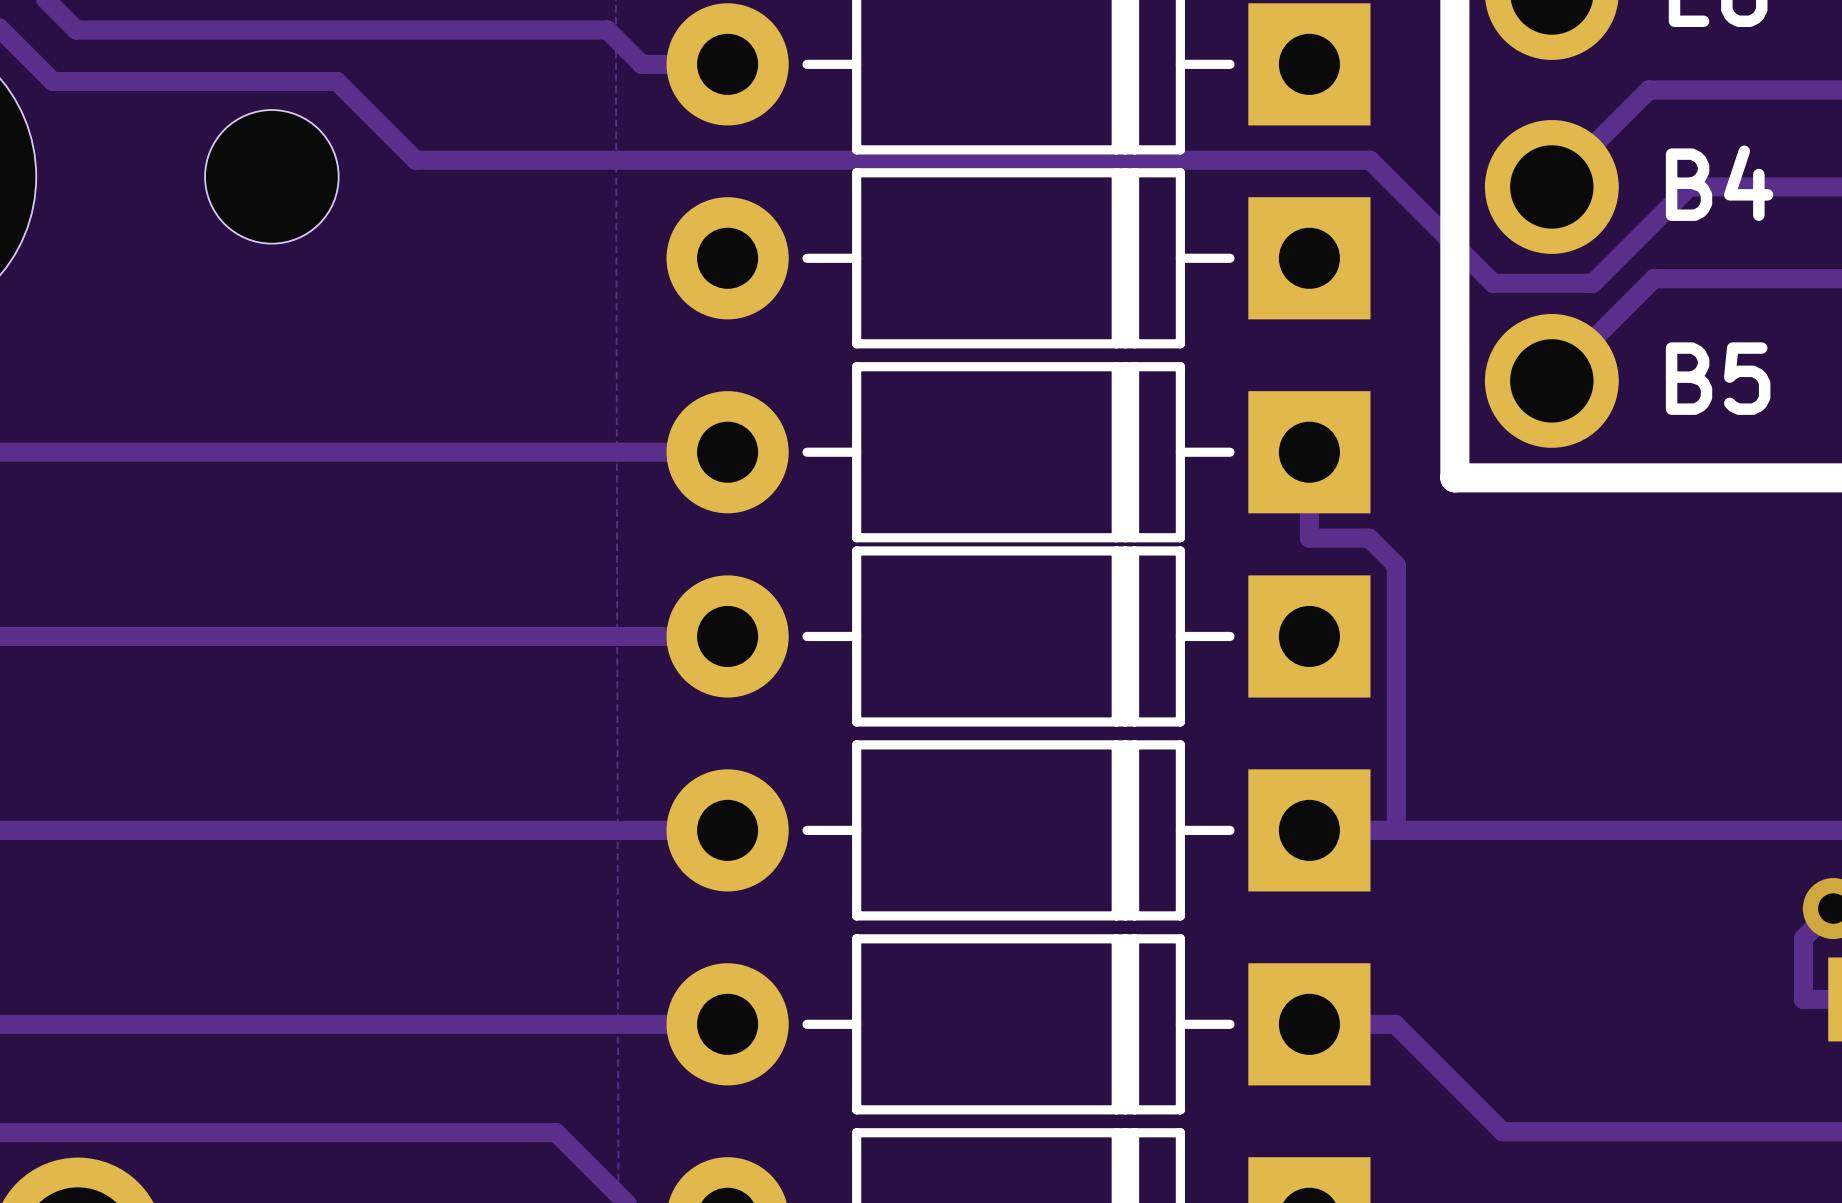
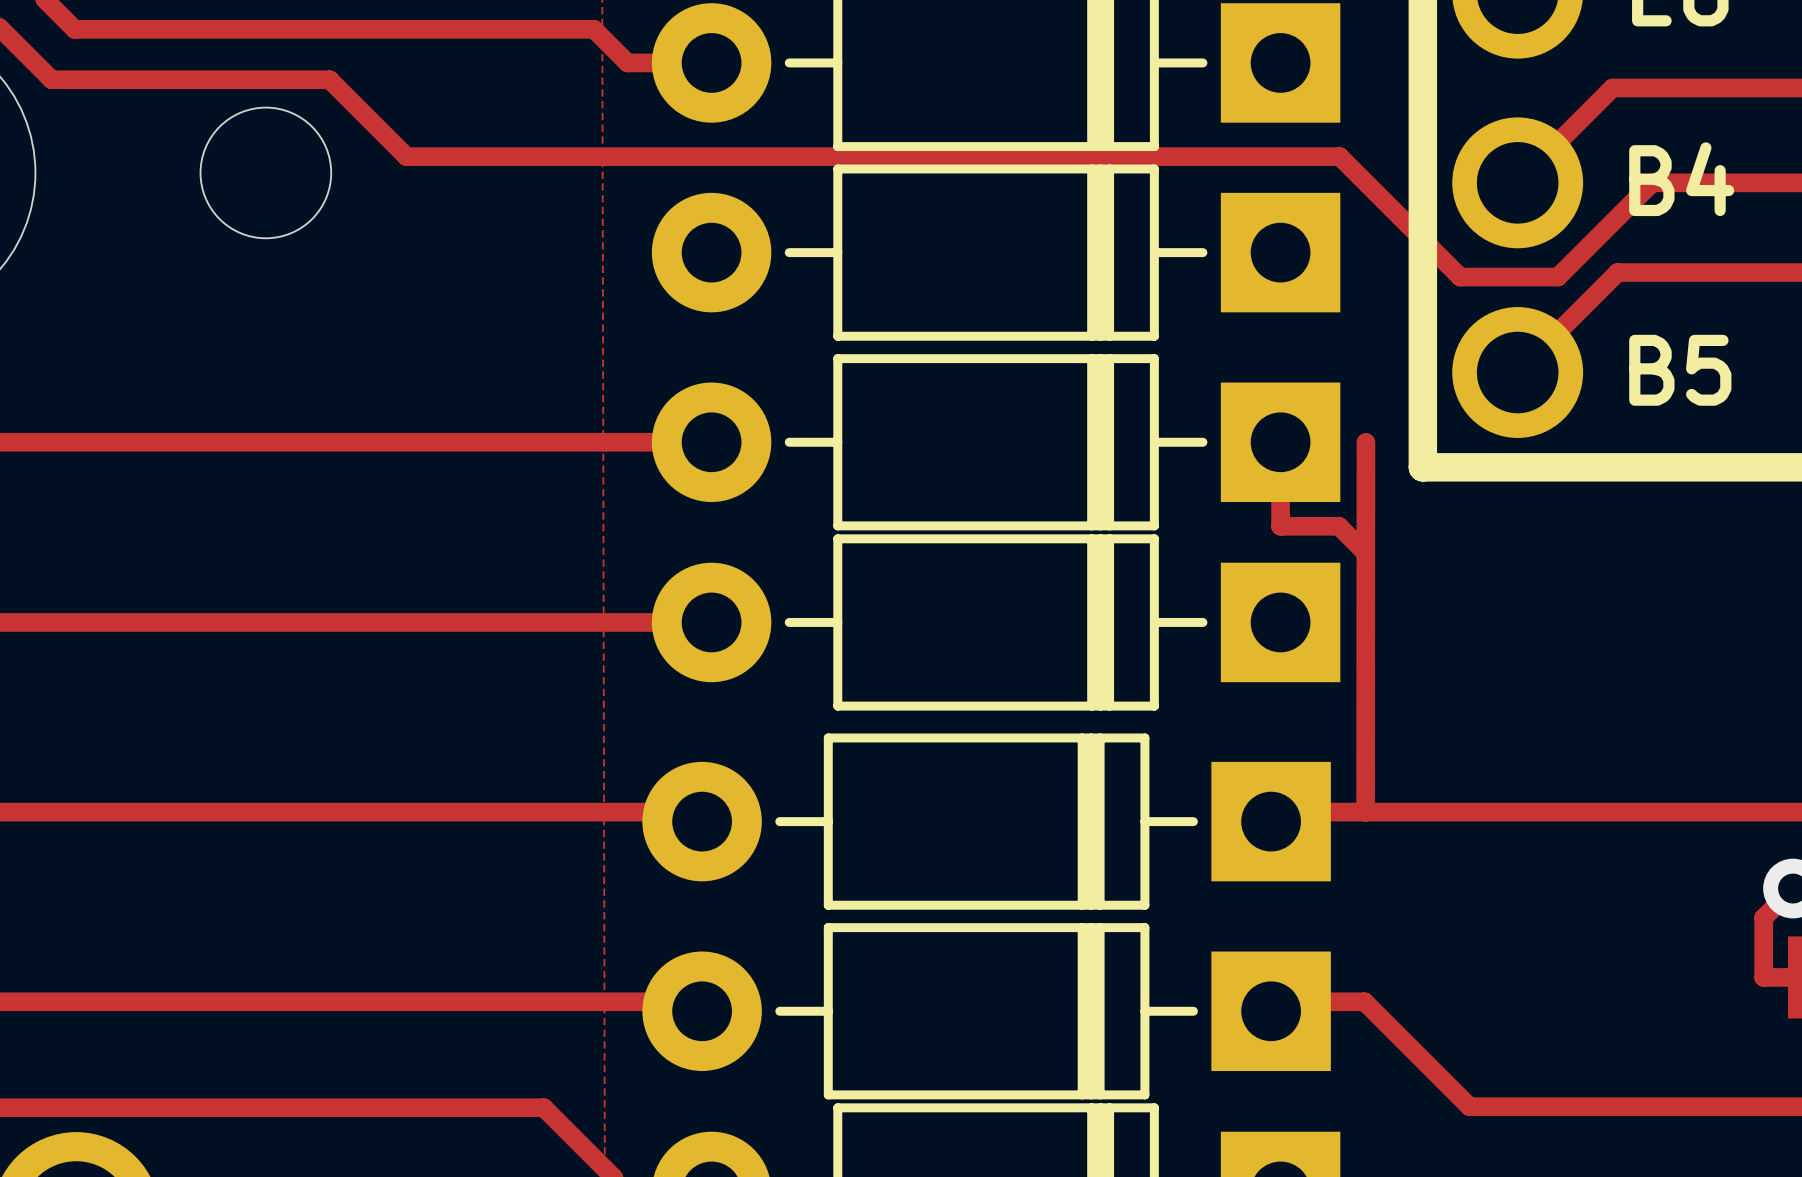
track: (1396, 565) (1396, 830) -> (1365, 442) (1365, 812)
part position: (1018, 830) -> (986, 821)
part position: (1018, 1024) -> (986, 1011)

